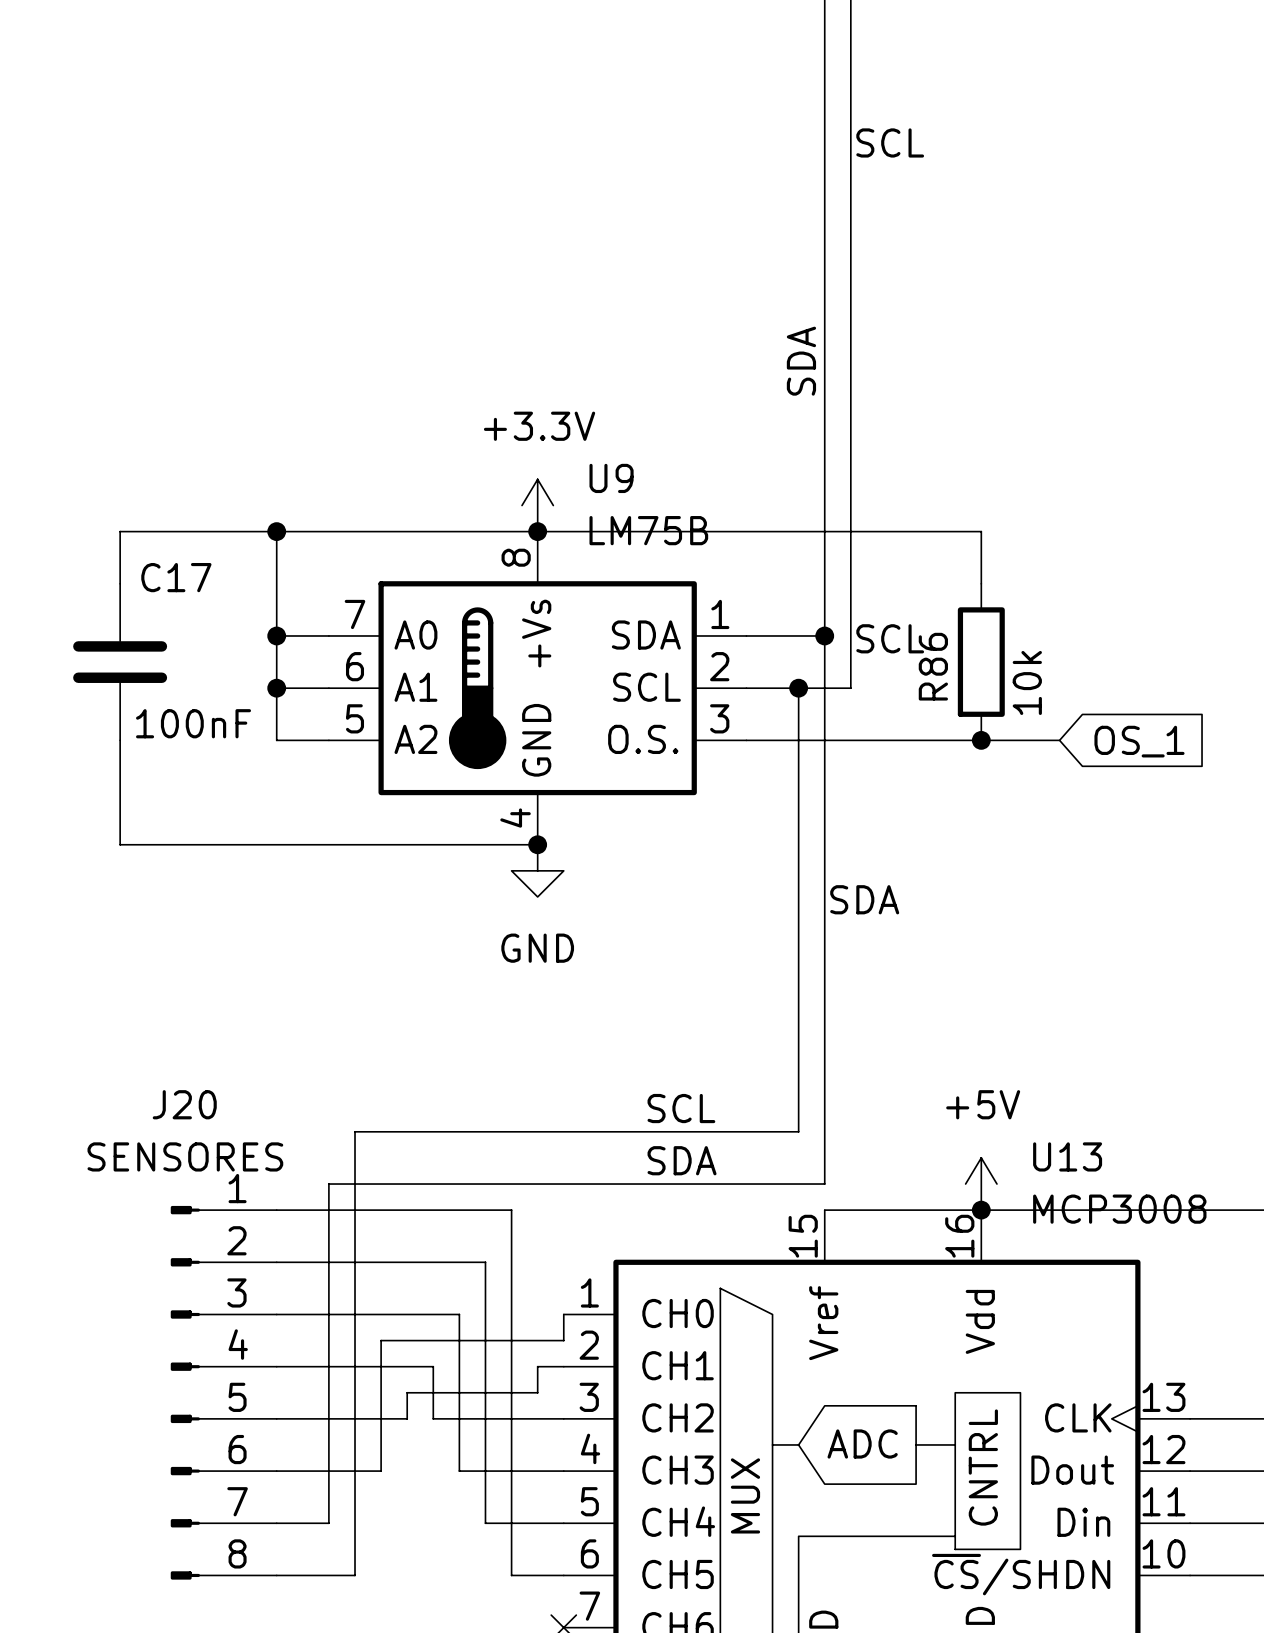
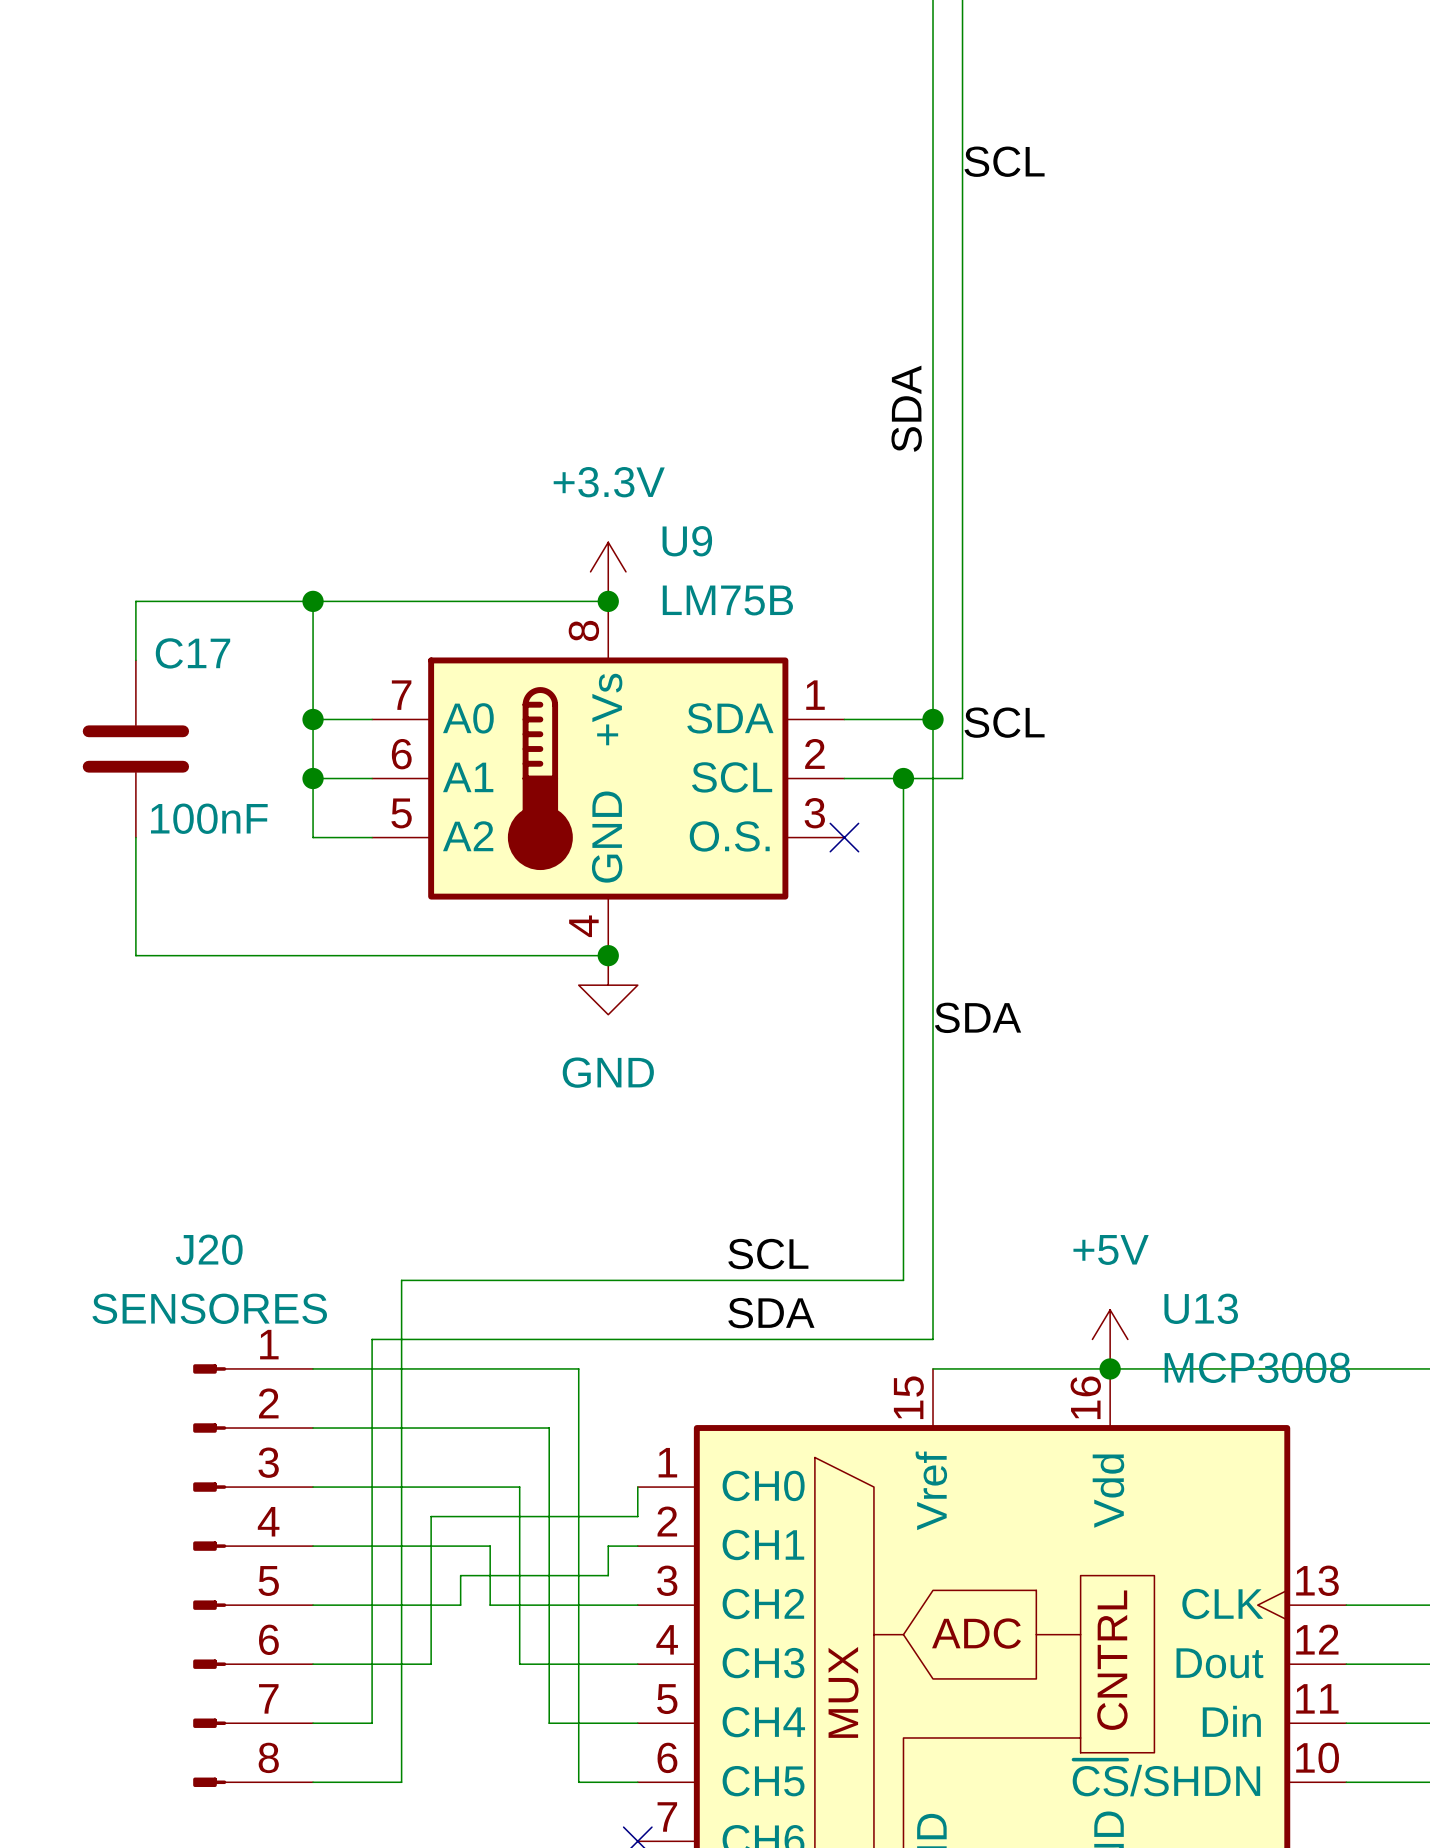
wire: (537, 531) (981, 531) (981, 583) -> none
R86: 10k (981, 662) -> none
wire: (746, 740) (1059, 740) -> none
no-connect mark: none -> (844, 837)
junction: (981, 740) -> none
global label: OS_1 (1139, 741) -> none

